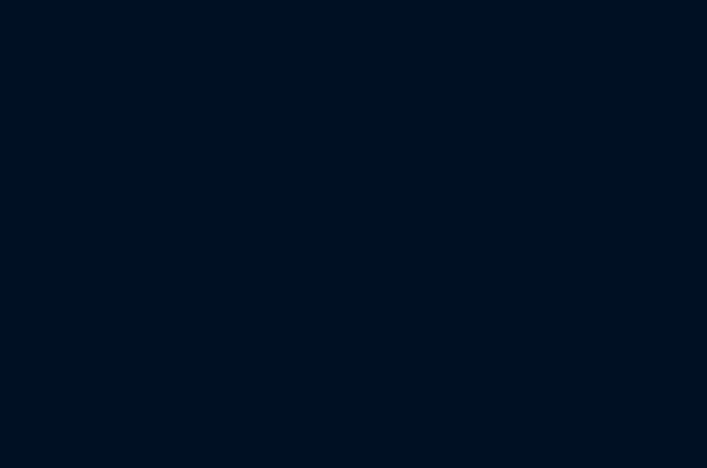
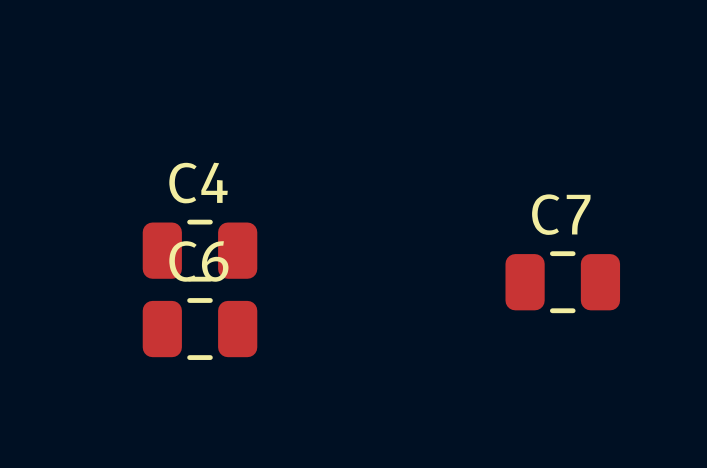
C4: none -> (200, 250)
C7: none -> (562, 282)
C6: none -> (200, 329)

